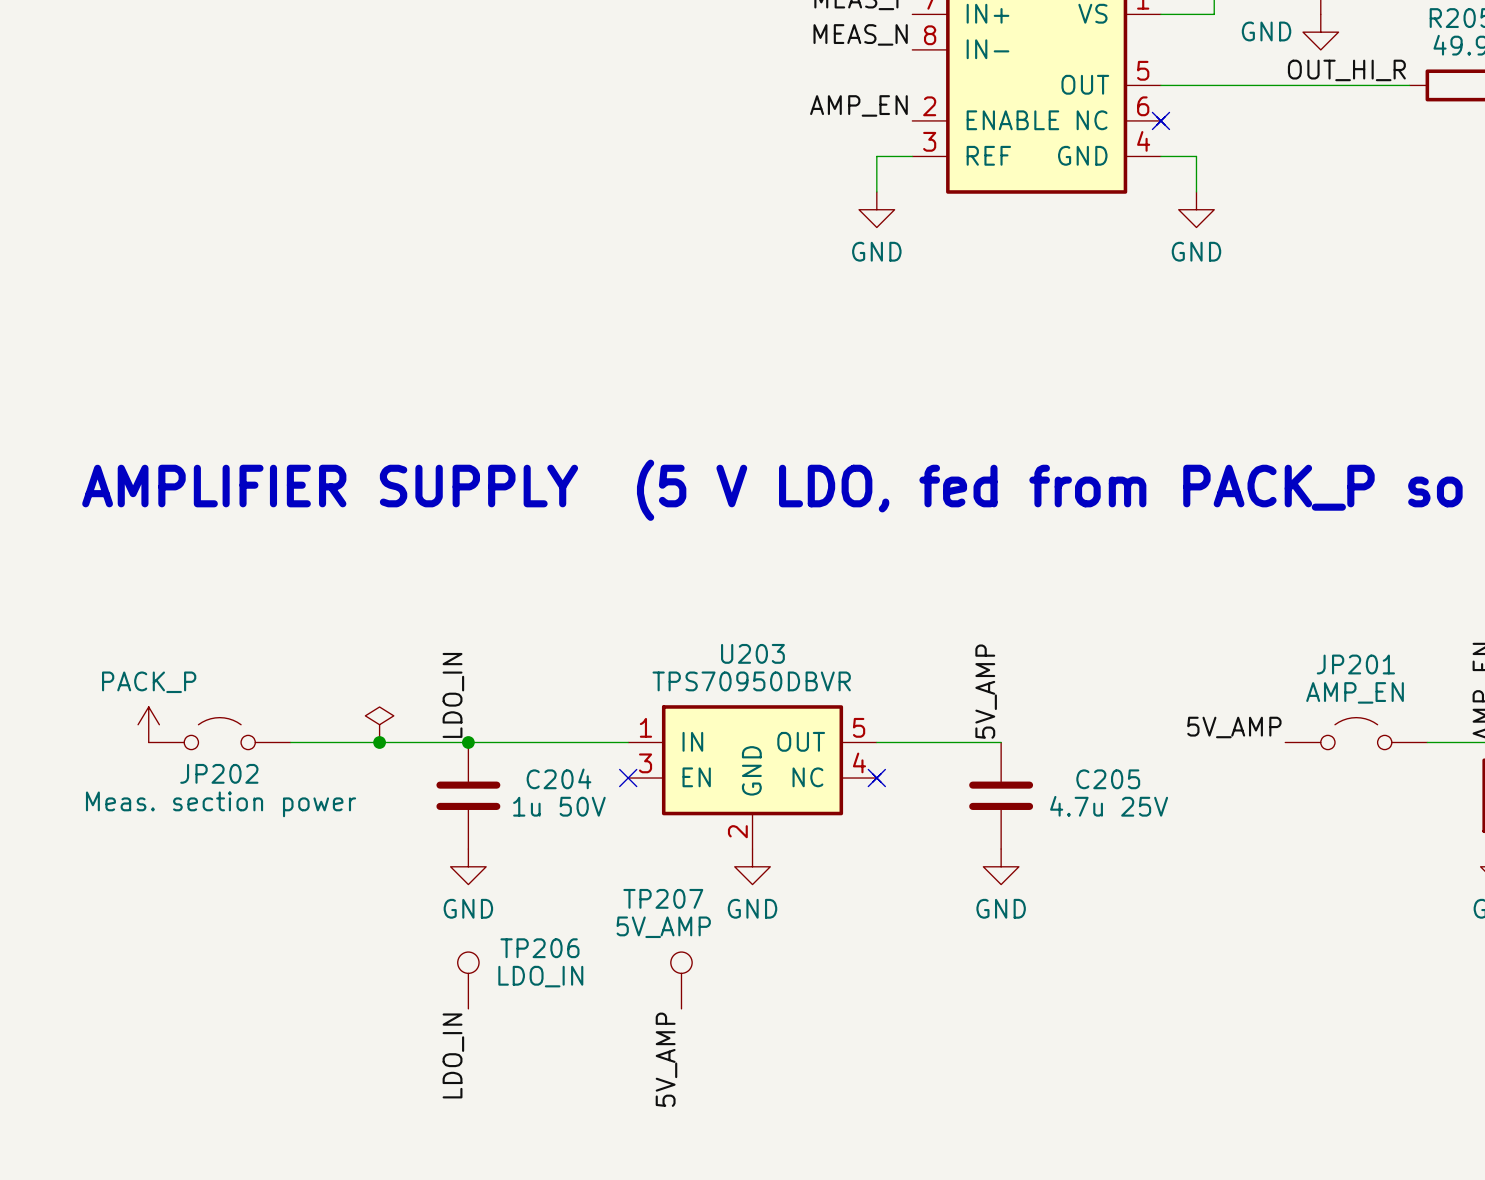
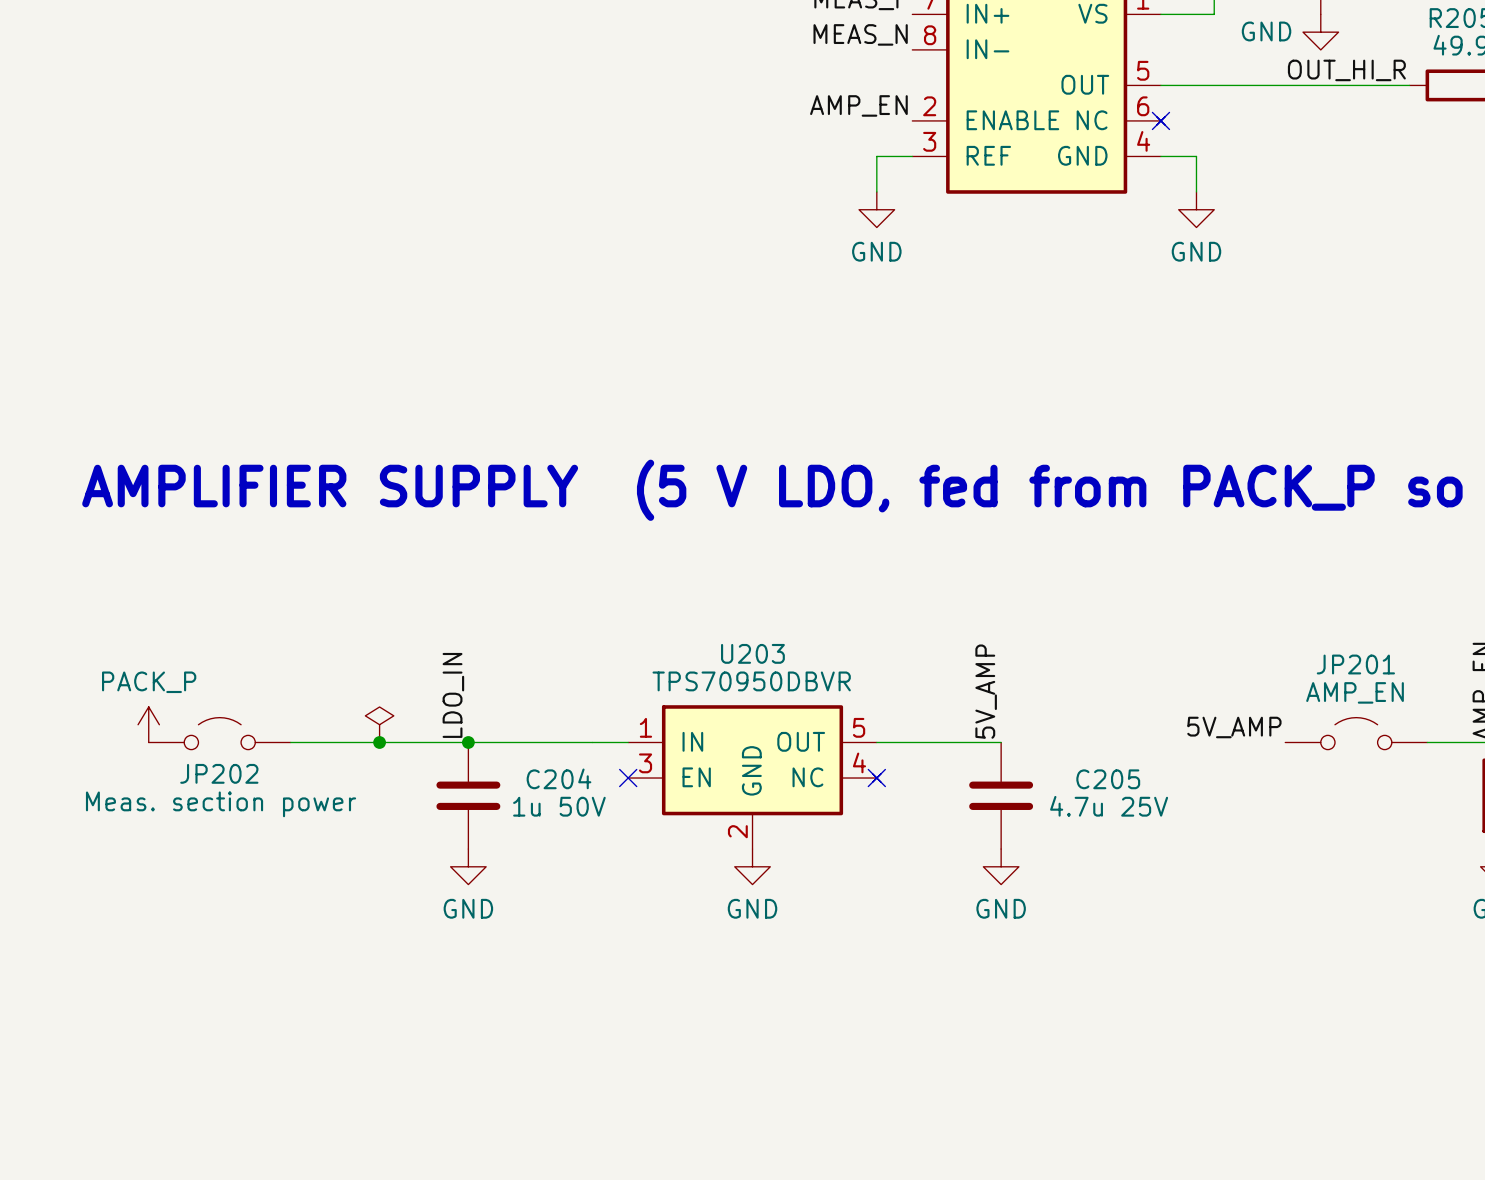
TP206: LDO_IN (468, 980) -> none
TP207: 5V_AMP (681, 980) -> none
label: LDO_IN (453, 1055) -> none
label: 5V_AMP (666, 1059) -> none

